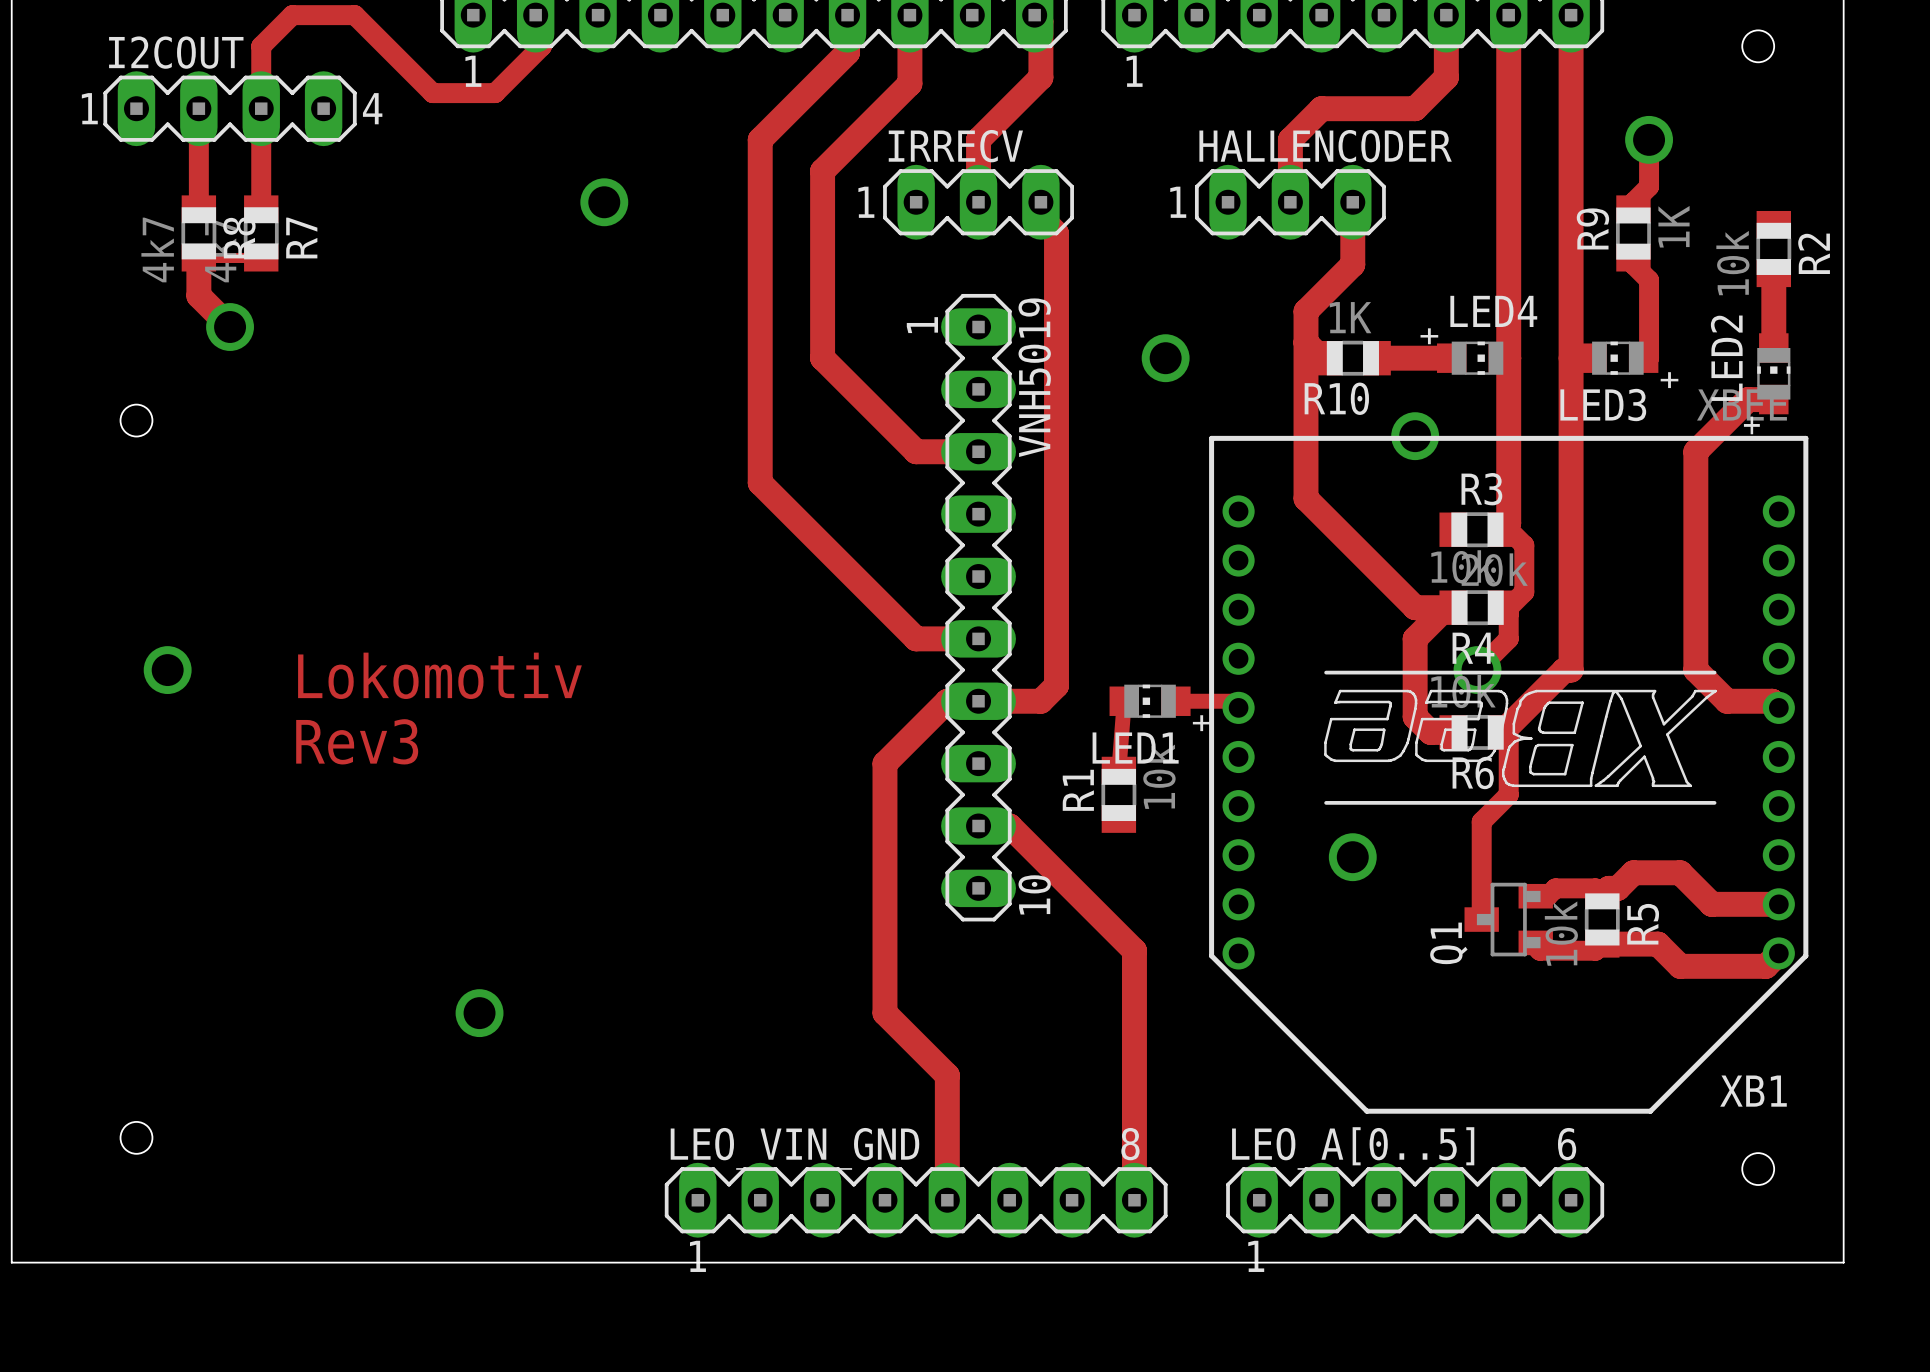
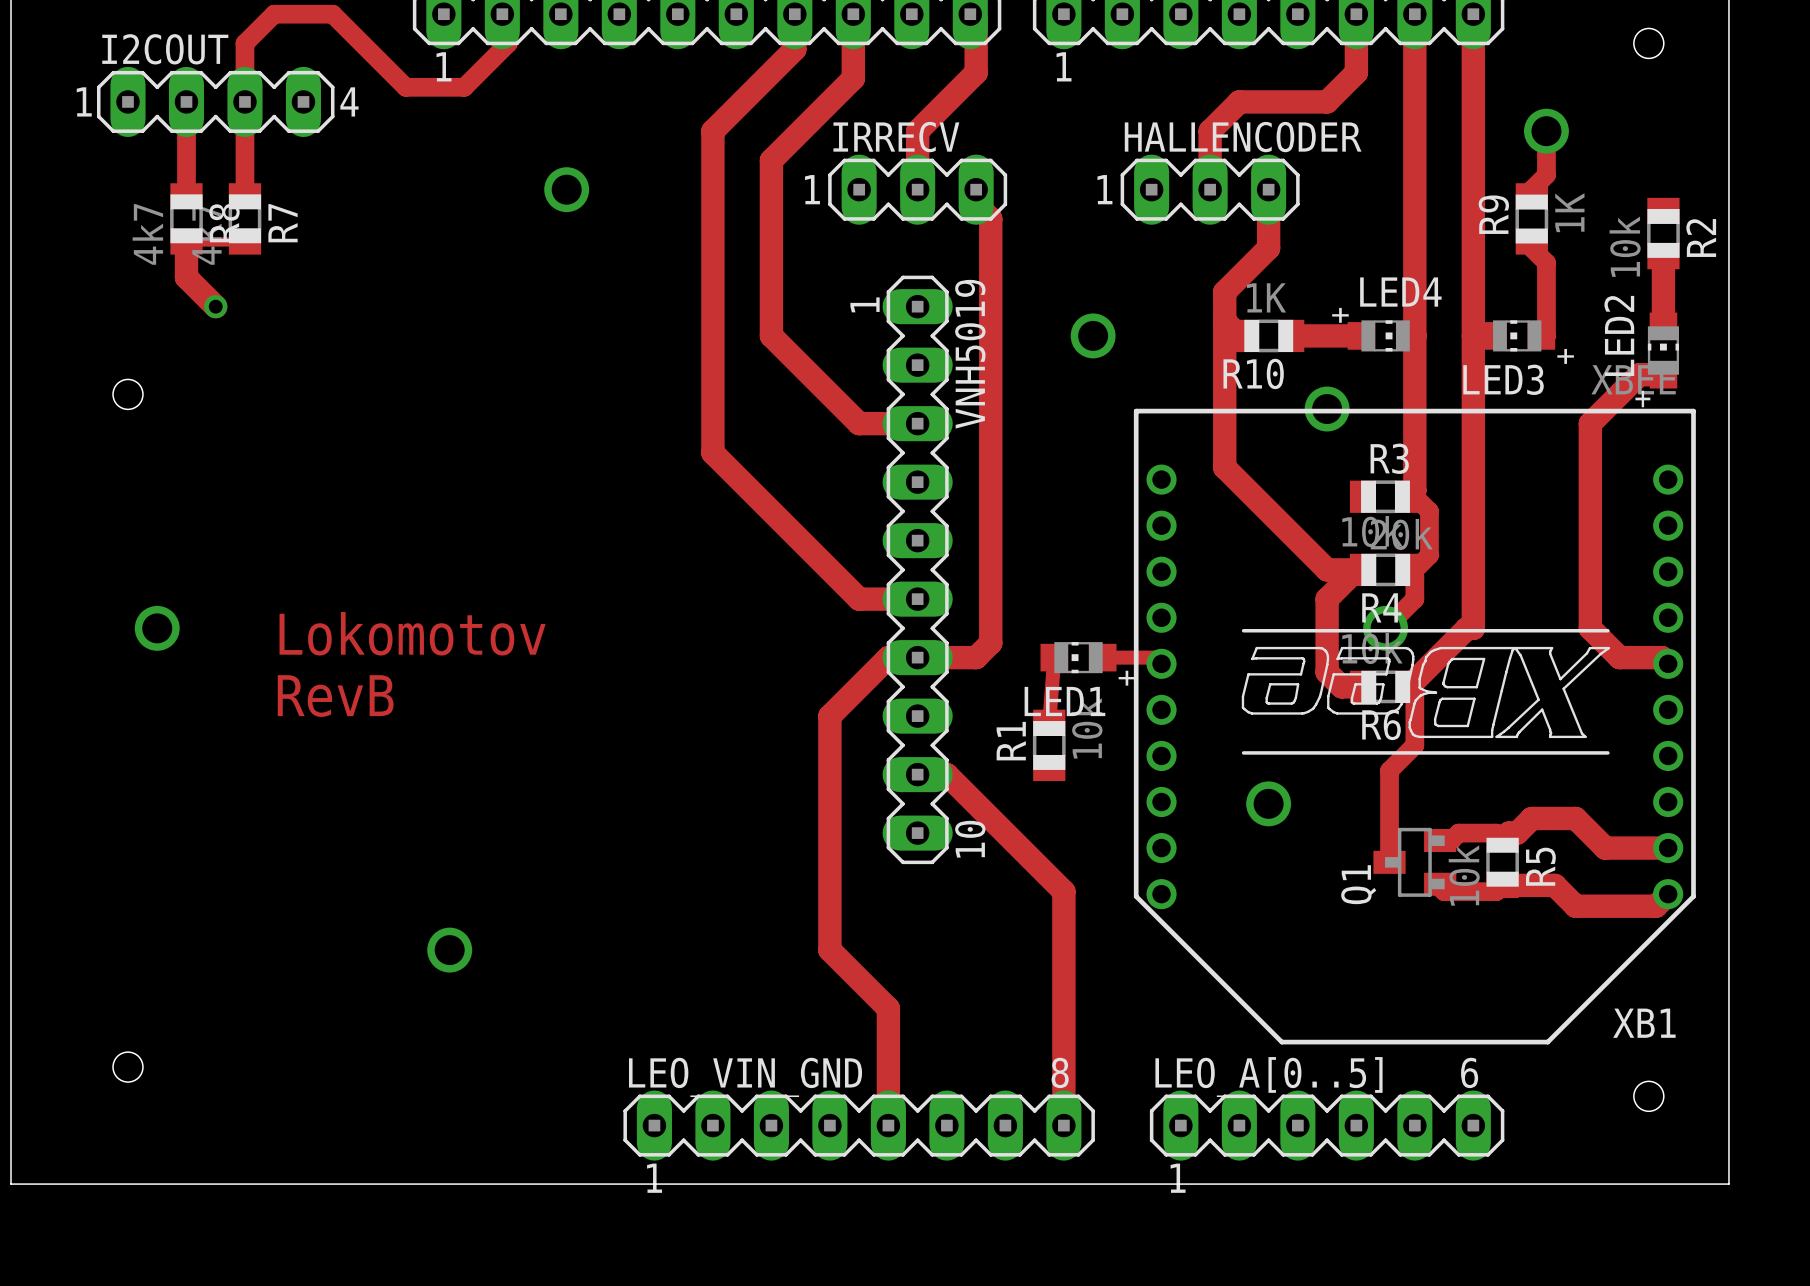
via size: [206, 303, 254, 351] -> [204, 295, 228, 319]
text: Lokomotiv (439, 675) -> Lokomotov (412, 633)
text: Rev3 (357, 741) -> RevB (335, 696)

